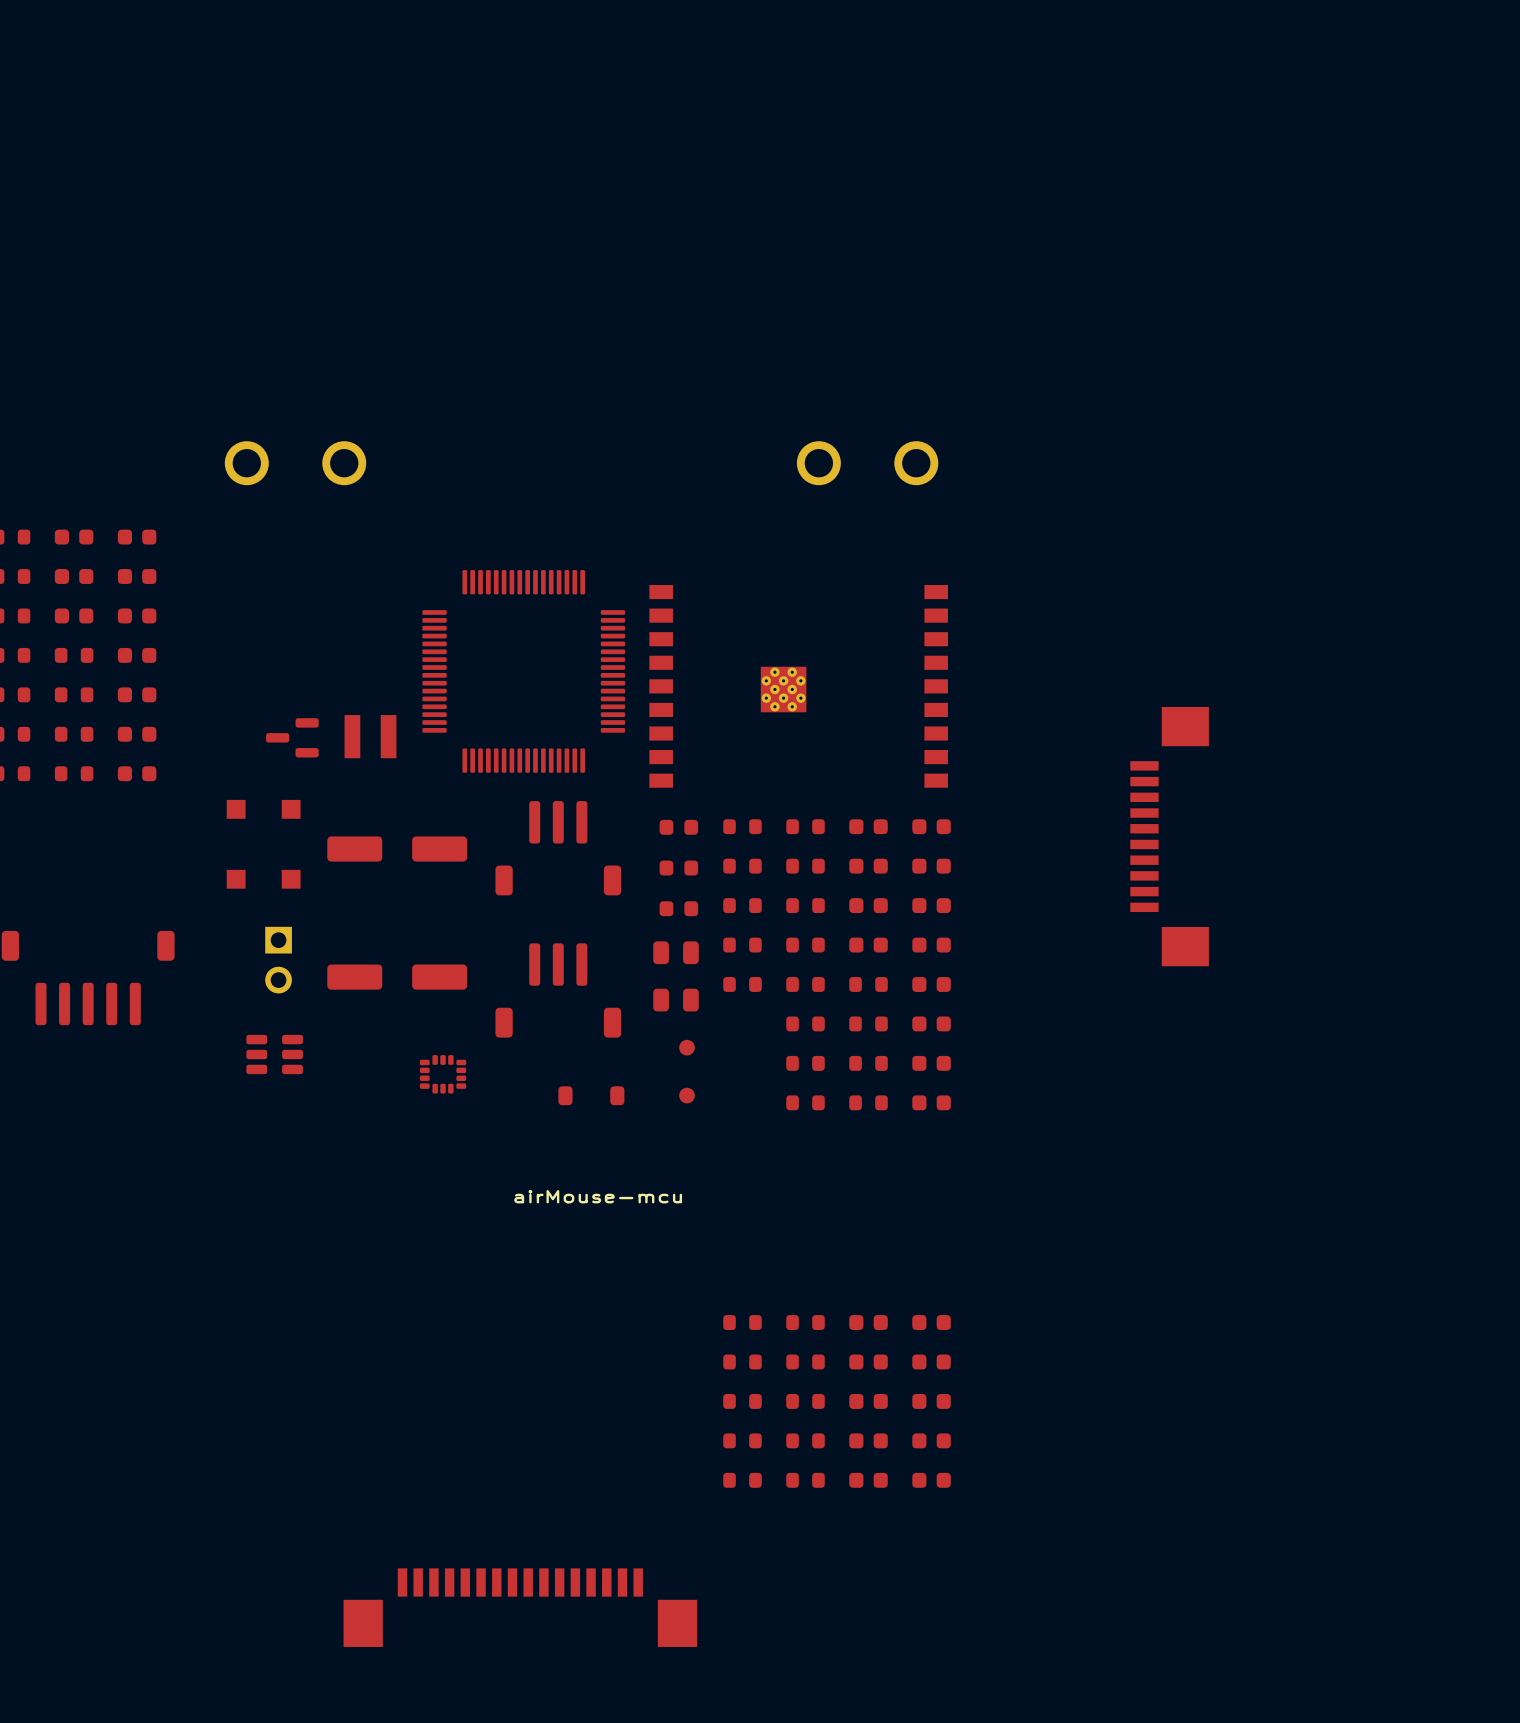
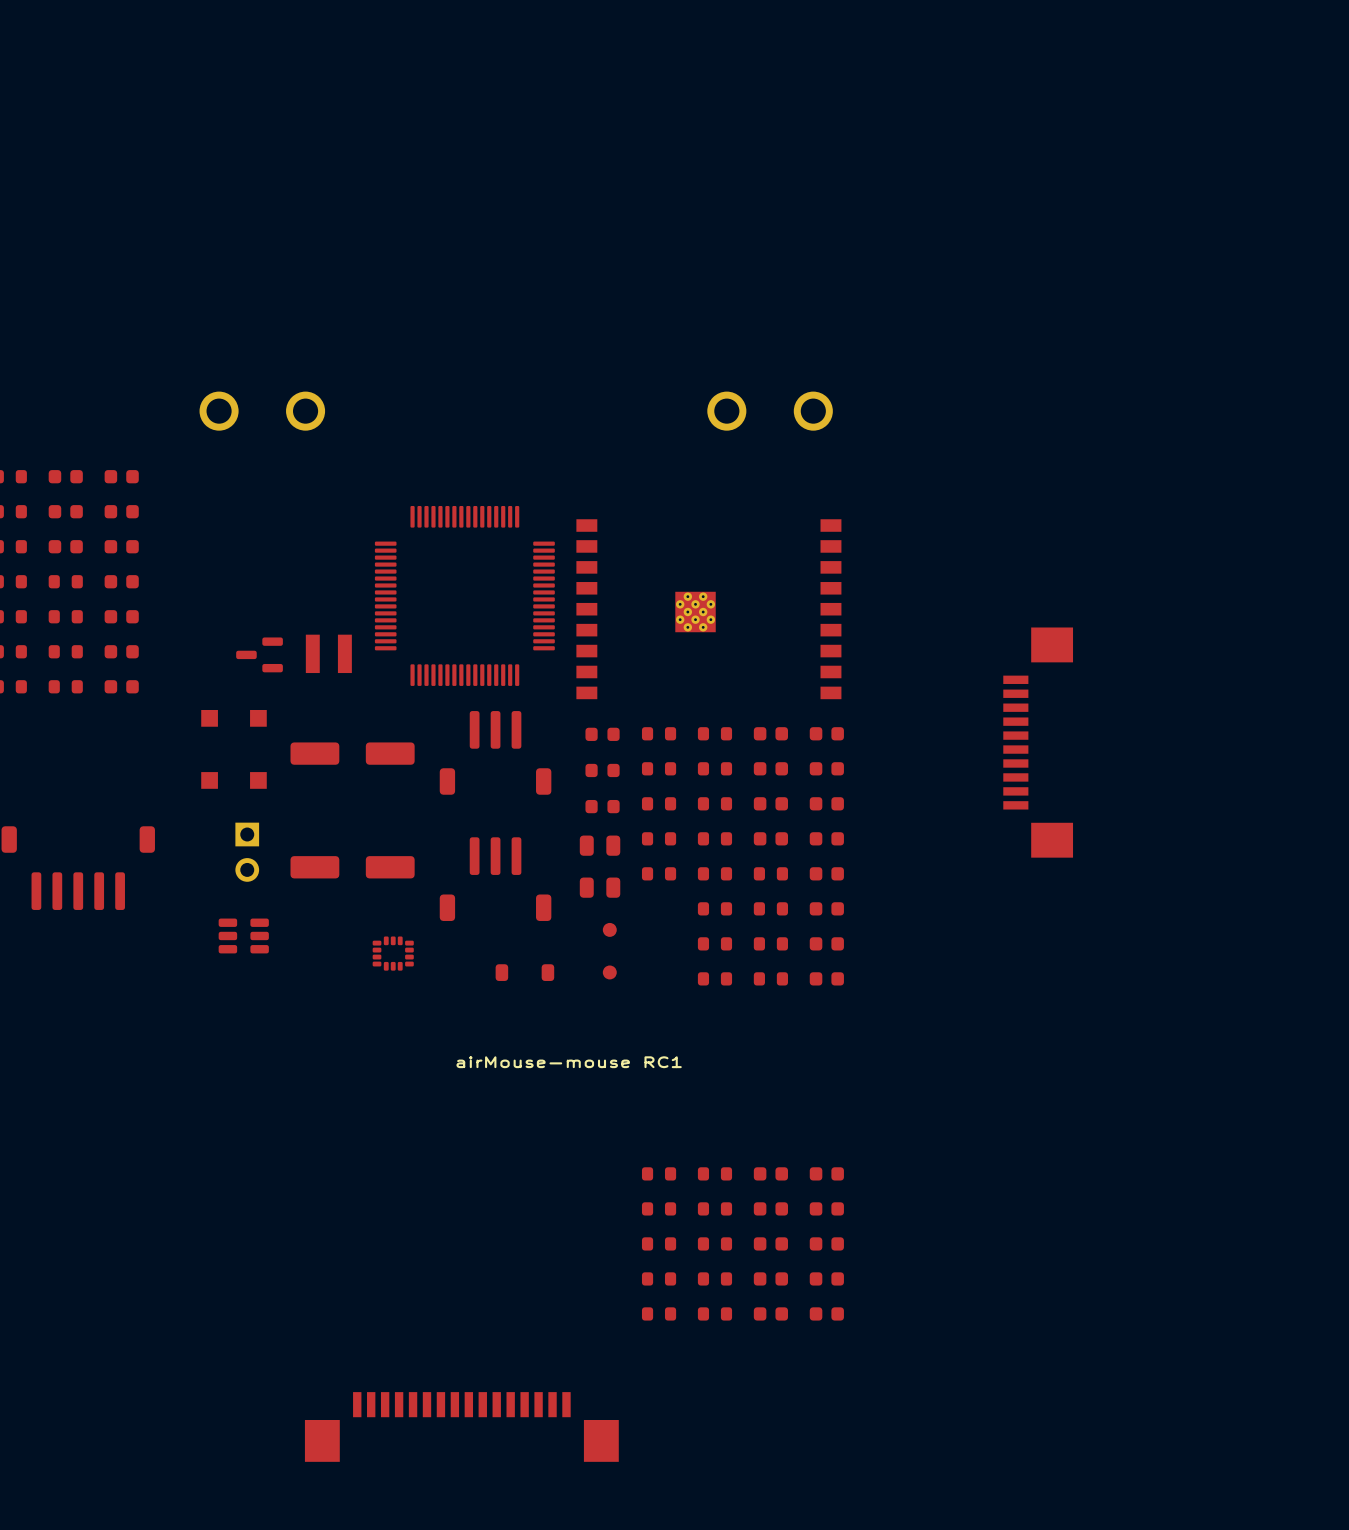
text: airMouse-mcu (598, 1196) -> airMouse-mouse RC1 (569, 1062)

